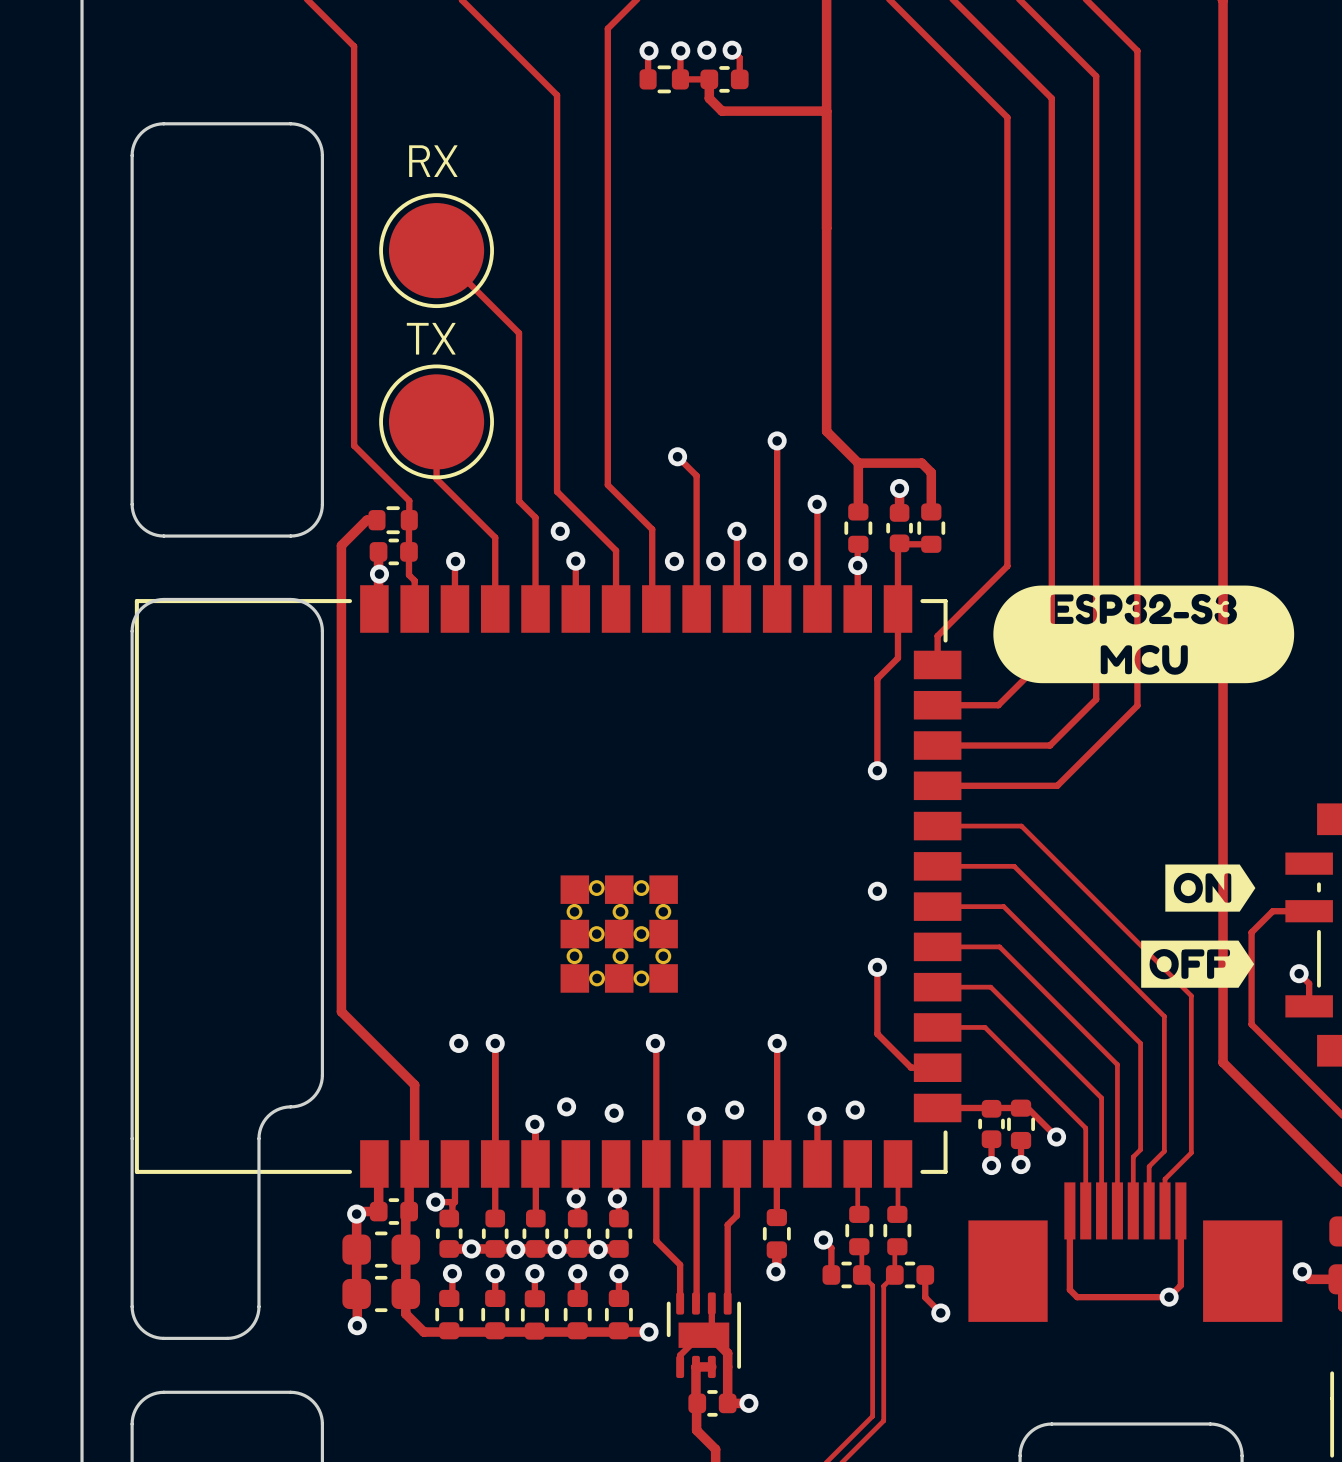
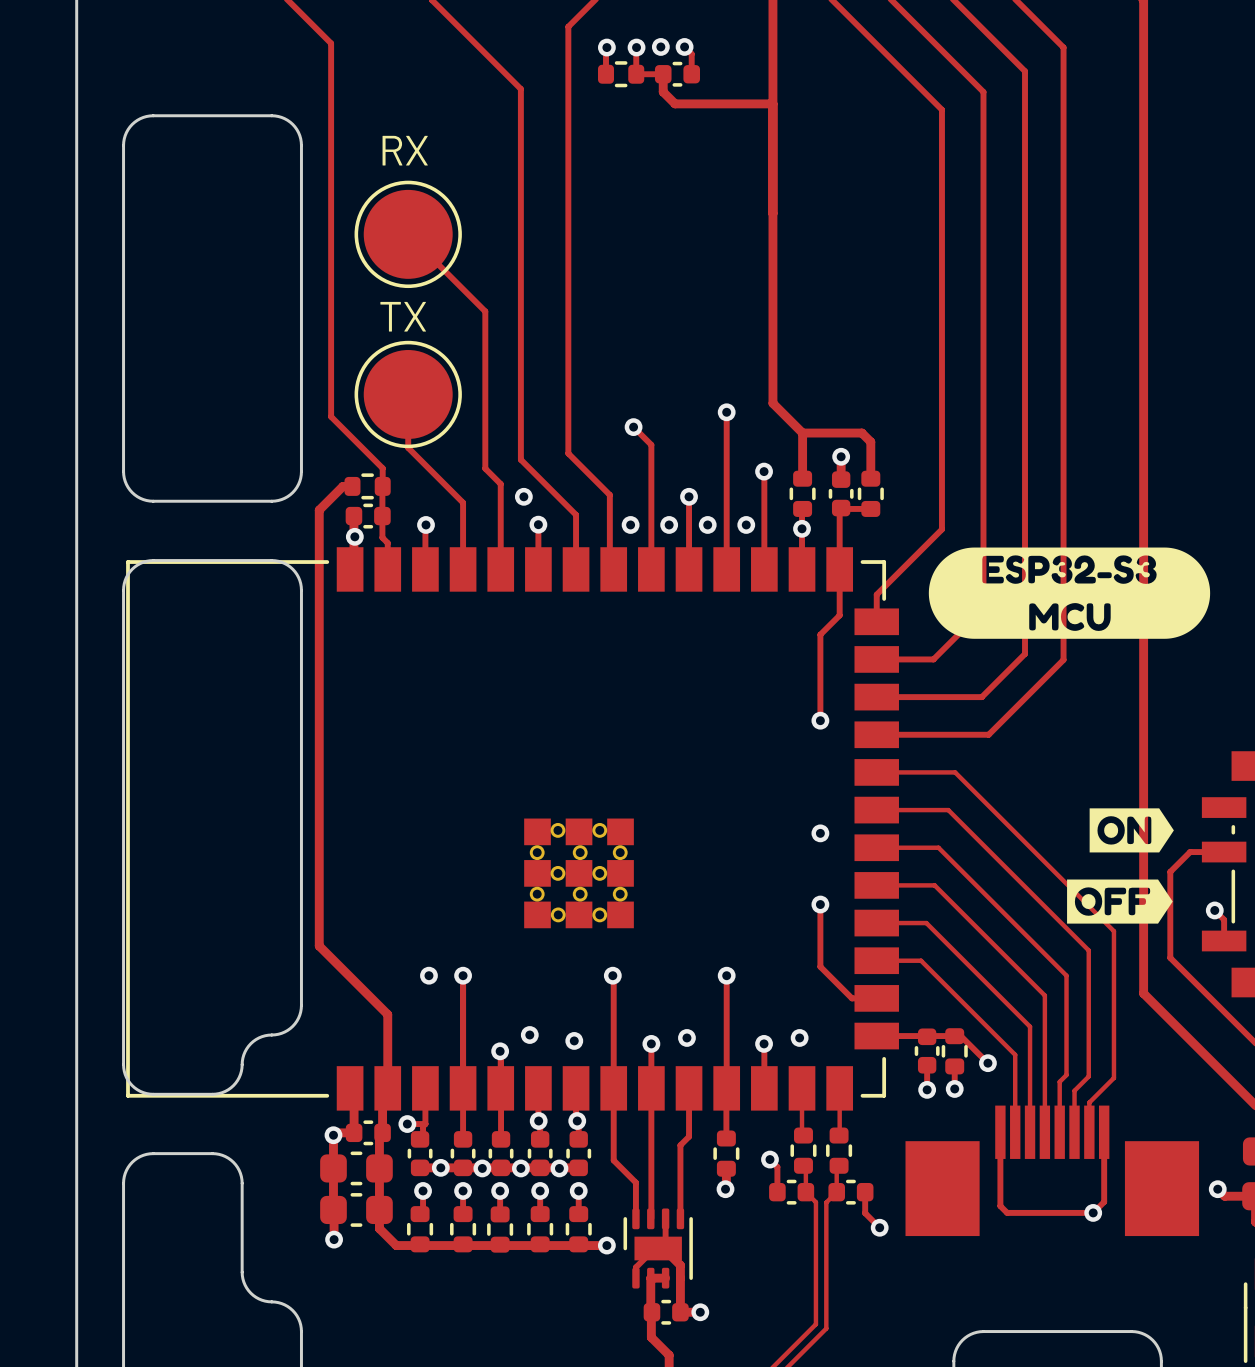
board edge: (132, 1138) (132, 1265) -> (123, 1064) (126, 1077) (132, 1085) (140, 1091) (153, 1094) (222, 1092) (230, 1087) (237, 1080) (242, 1064)
board edge: (258, 1138) (258, 1265) -> (123, 1183) (126, 1170) (132, 1162) (140, 1156) (153, 1153) (222, 1155) (230, 1160) (237, 1167) (242, 1183)
board edge: (132, 1306) (133, 1317) (141, 1329) (153, 1336) (163, 1338) (227, 1338) (237, 1336) (252, 1326) (257, 1317) (258, 1306) -> (123, 1221) (123, 1331)
board edge: (290, 1392) (156, 1393) (146, 1397) (139, 1404) (133, 1413) (132, 1424) -> (271, 1301) (262, 1300) (253, 1295) (243, 1282) (242, 1221)

